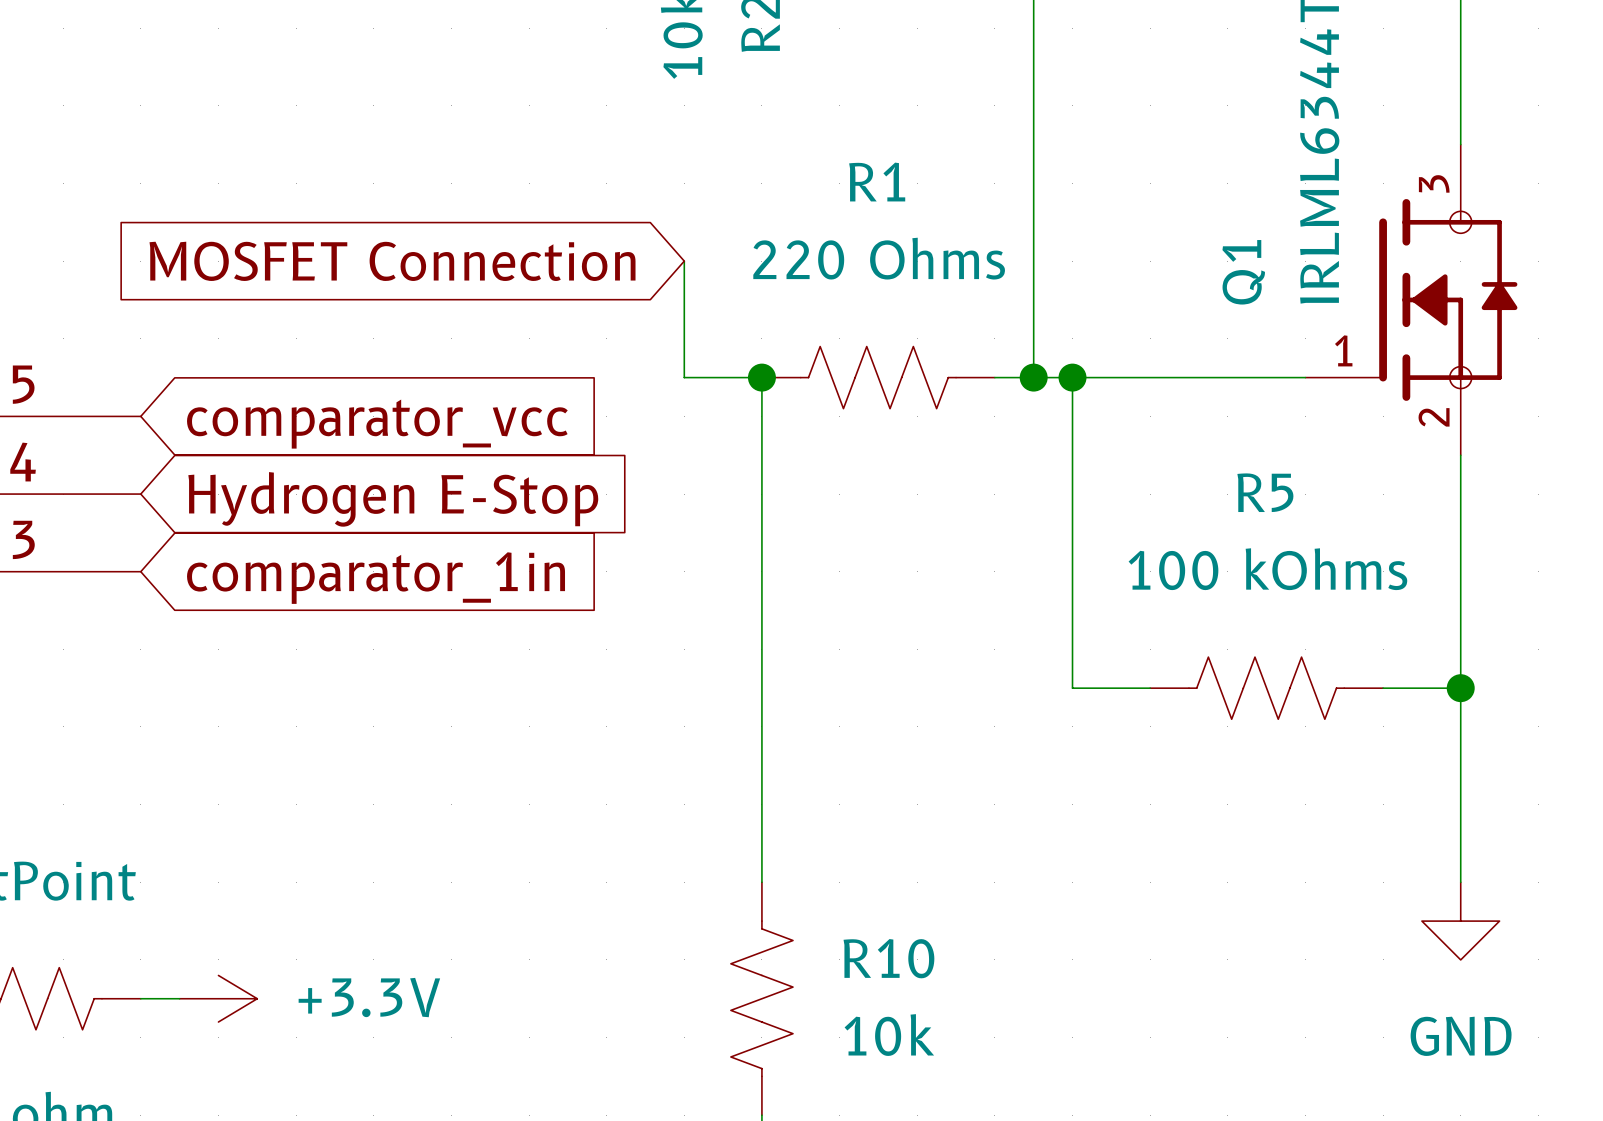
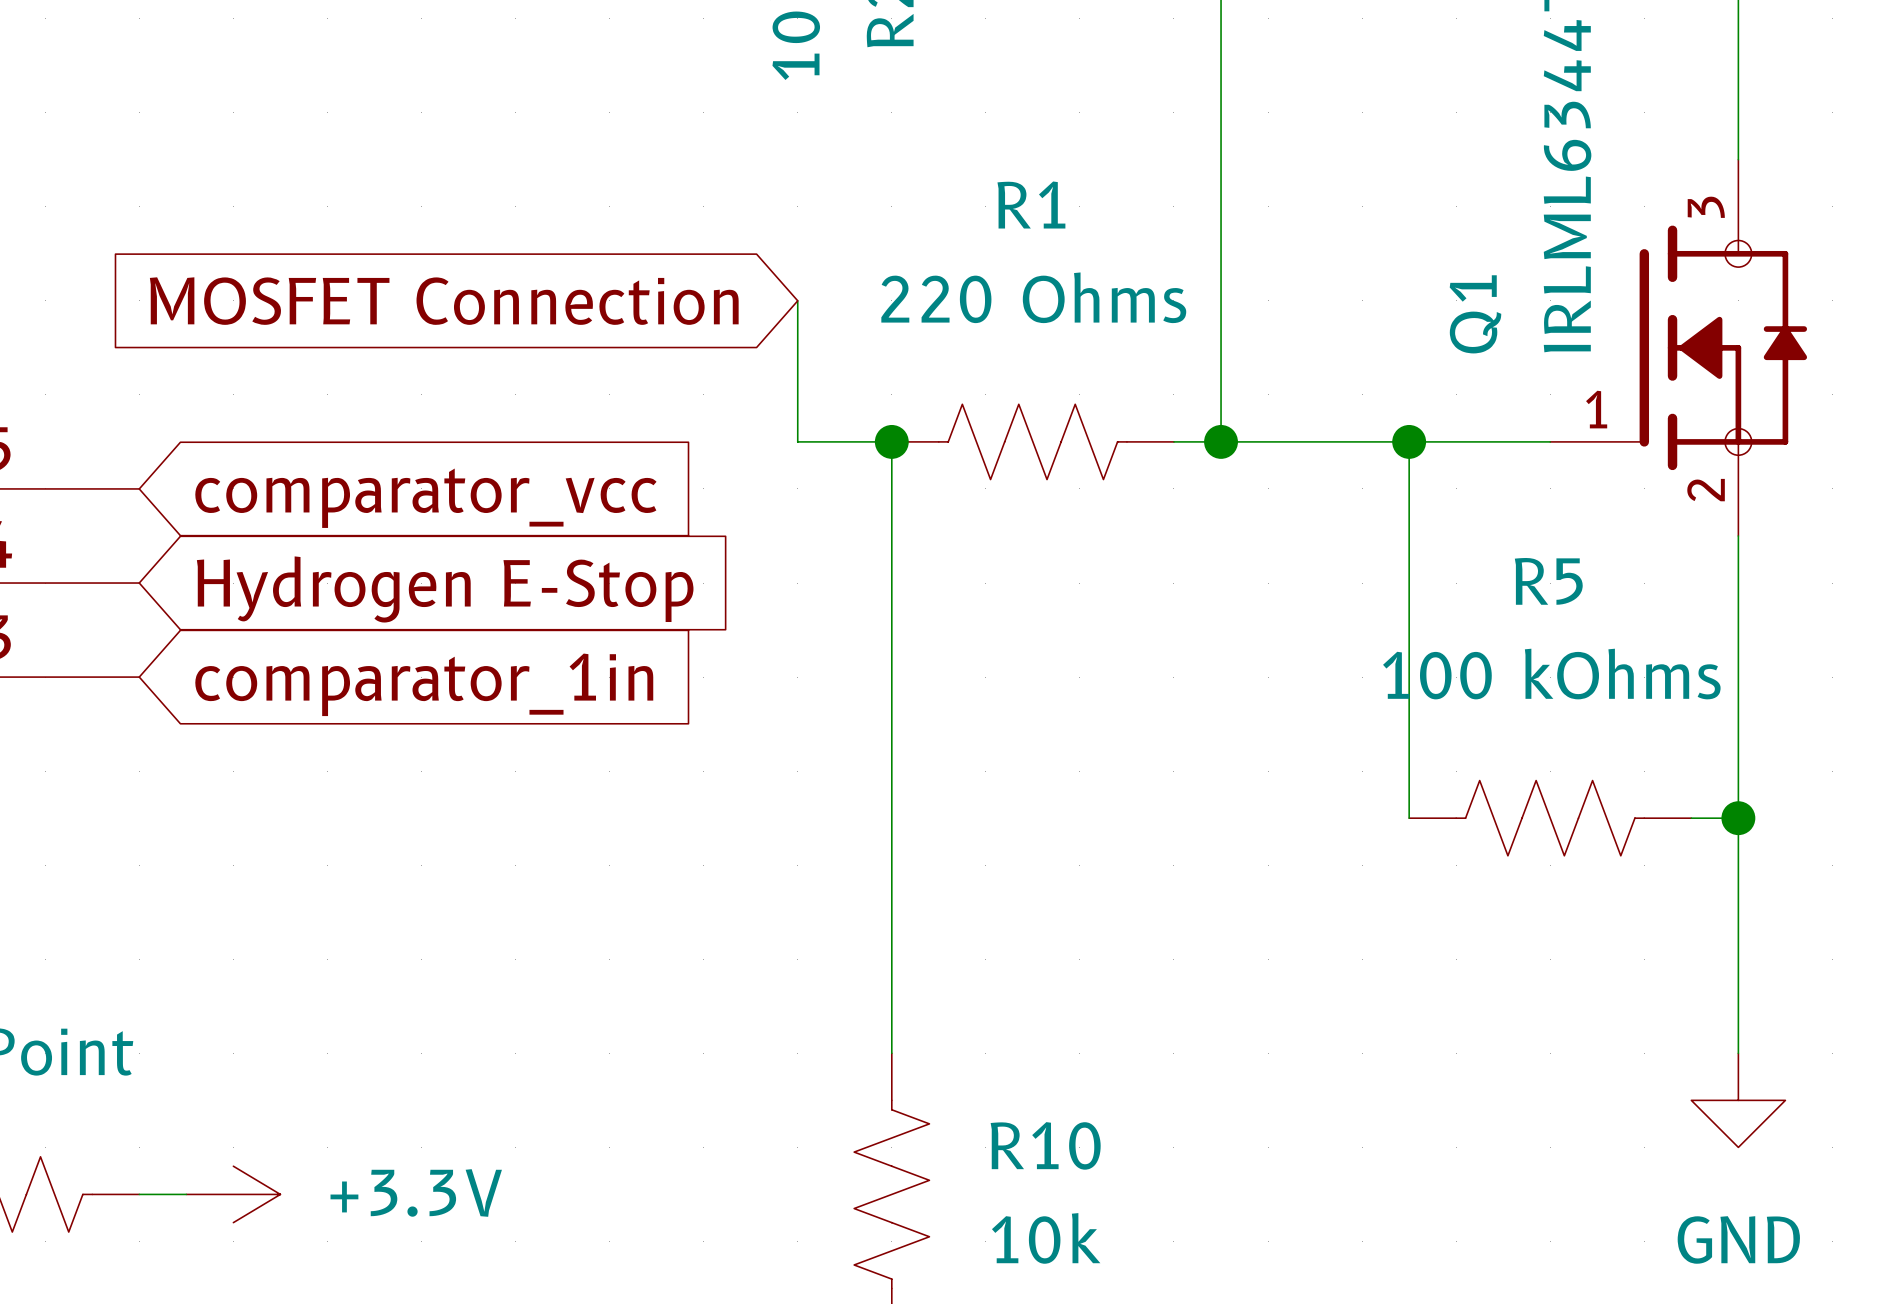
wire: (1072, 377) (1072, 688) (1150, 688) -> none
junction position: (1072, 377) -> (1409, 441)
wire: none -> (1409, 441) (1409, 818)
R5 position: (1266, 688) -> (1550, 818)

